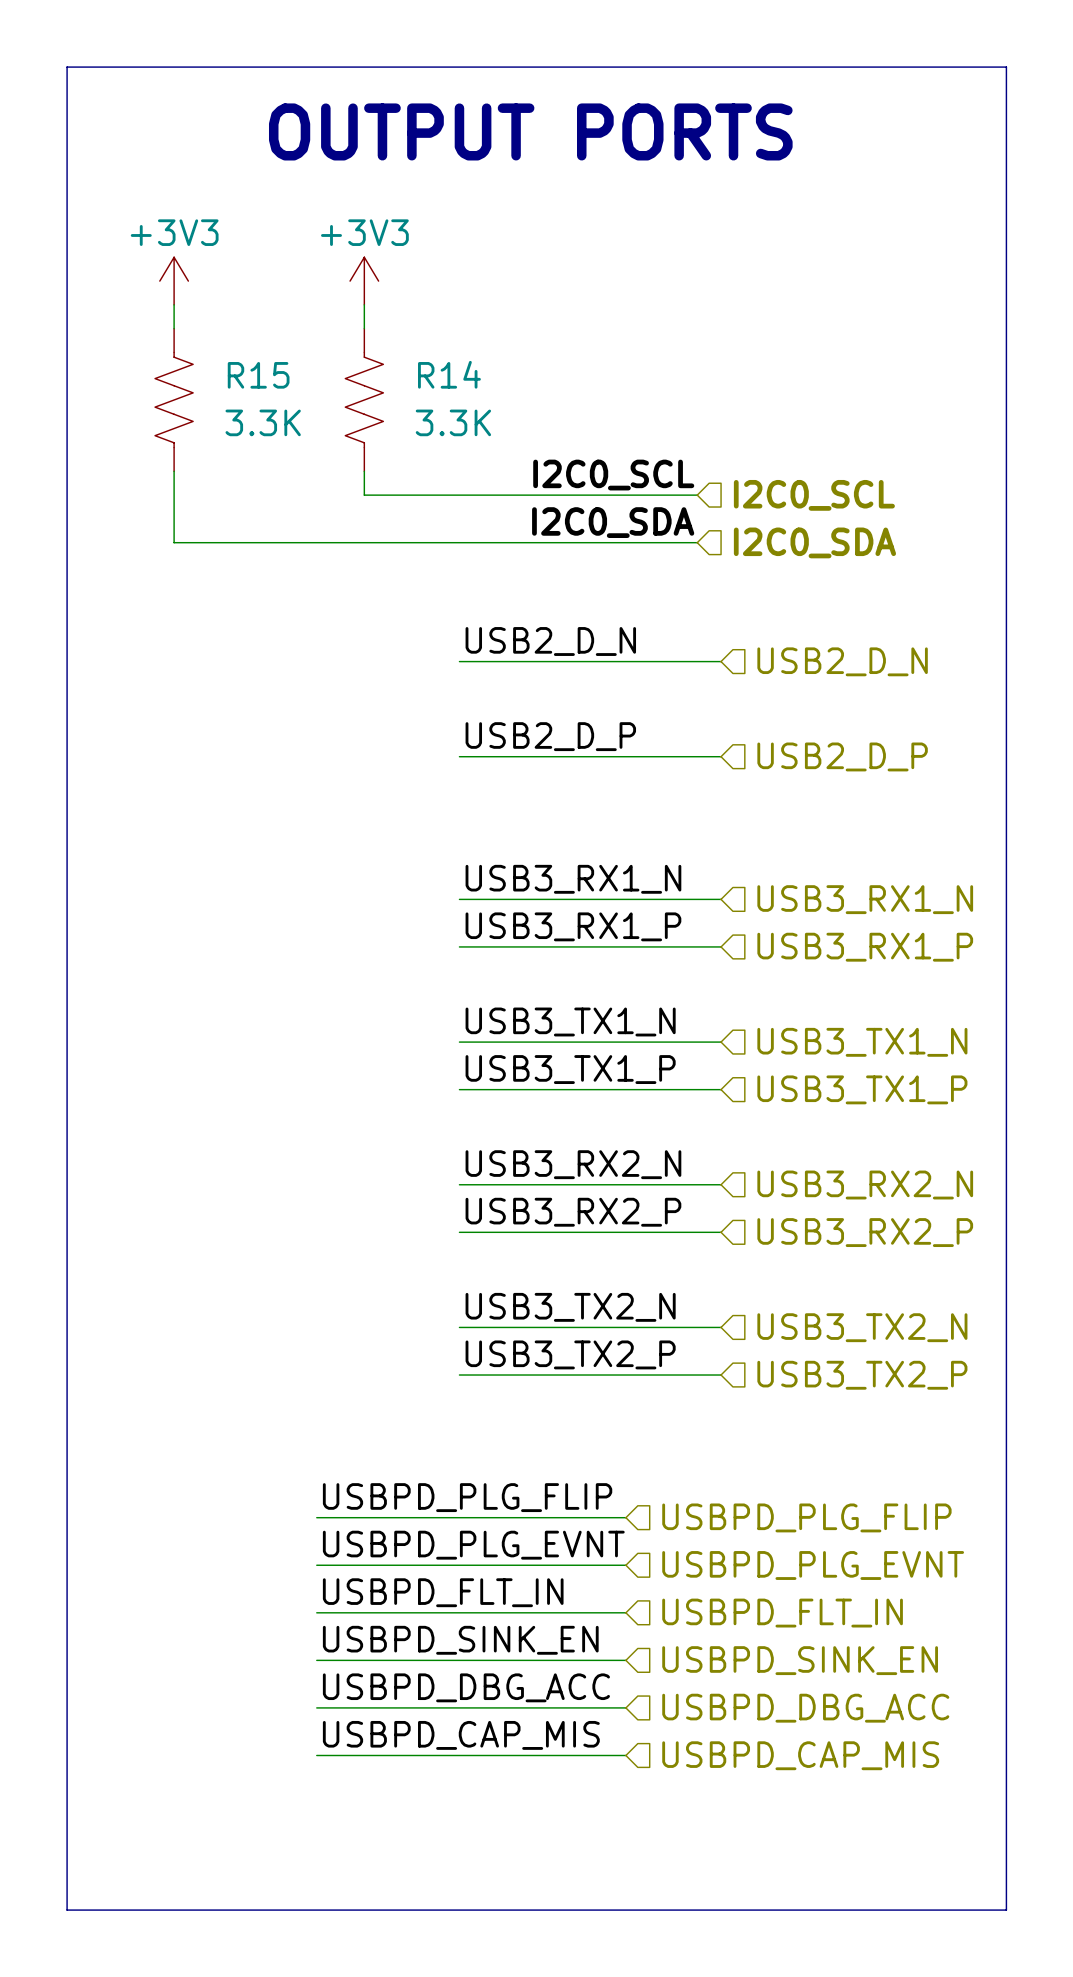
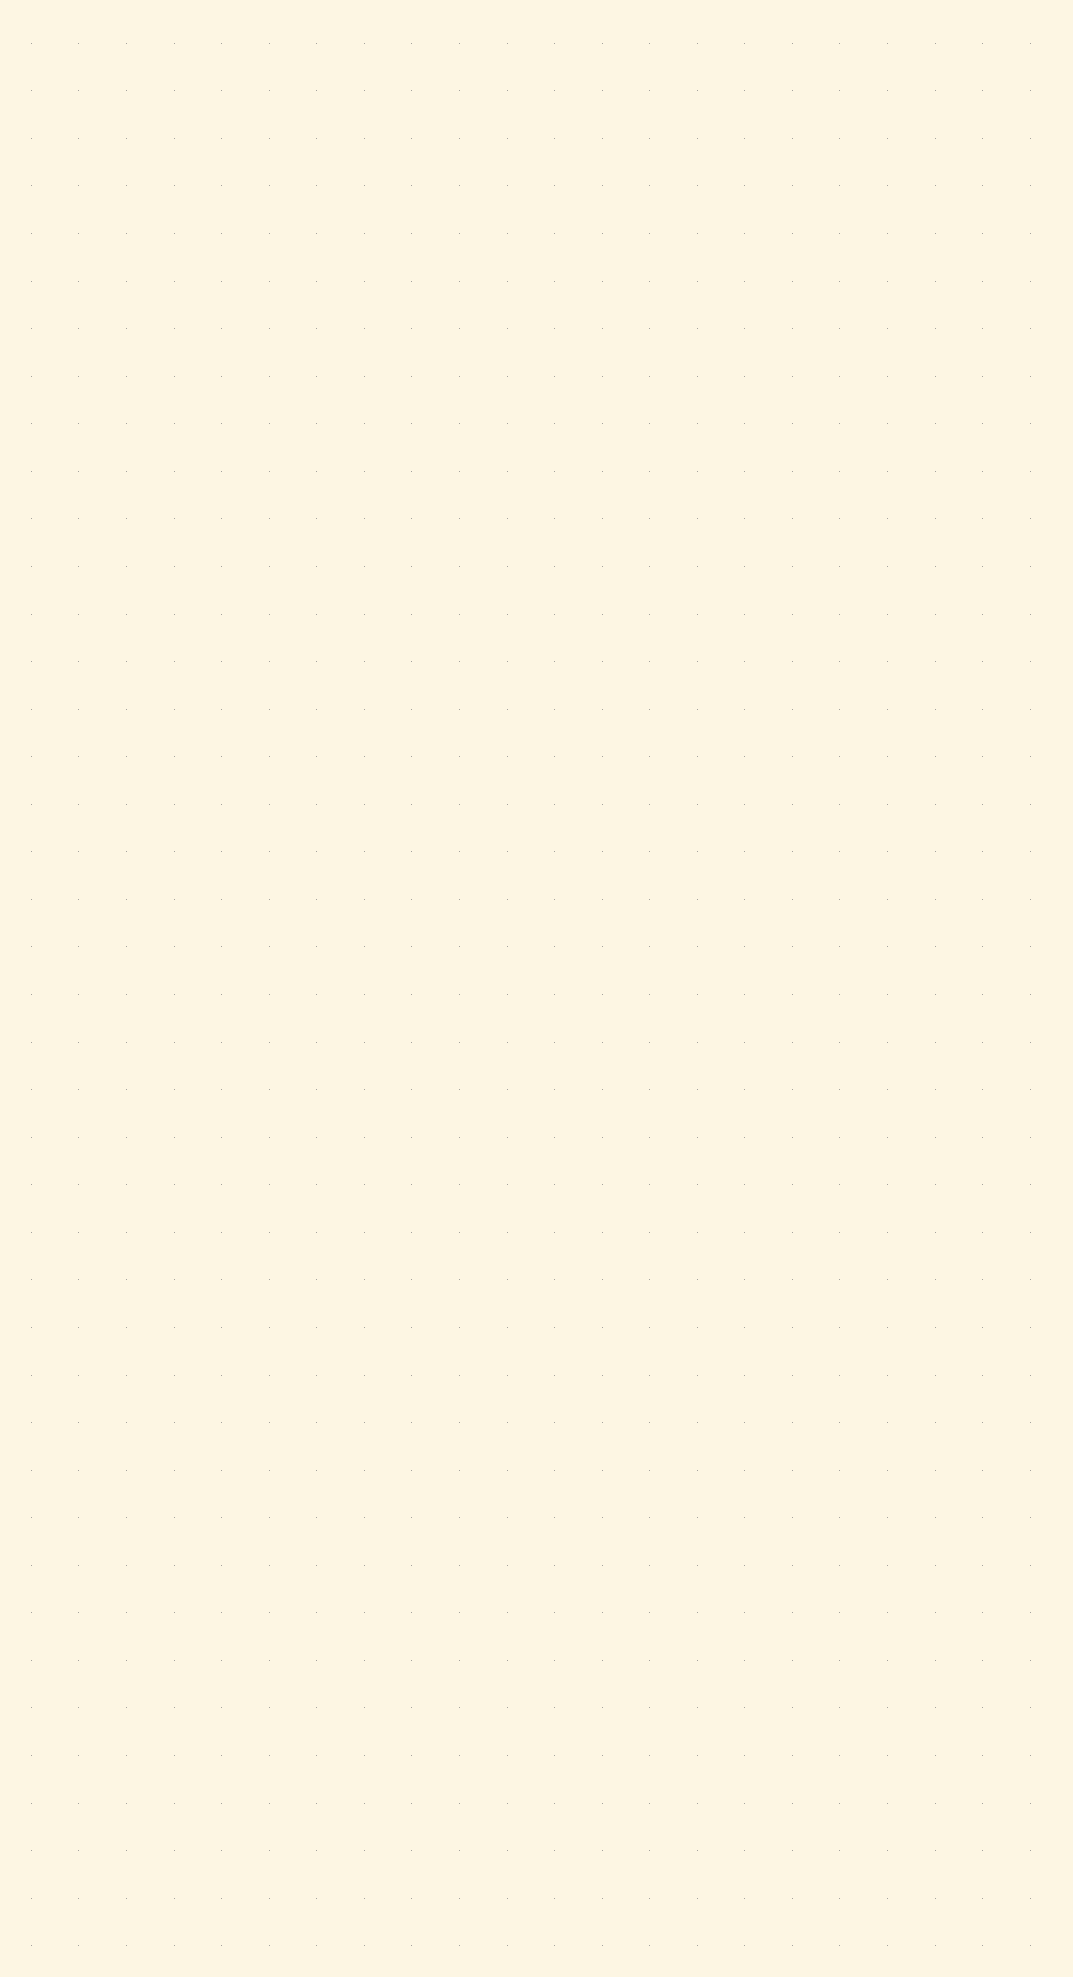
line: (67, 67) (1006, 67) (1006, 1910) (67, 1910) (67, 67) -> none
text: OUTPUT PORTS (530, 131) -> none
power symbol: +3V3 (174, 281) -> none
power symbol: +3V3 (364, 281) -> none
wire: (174, 304) (174, 328) -> none
wire: (364, 304) (364, 328) -> none
R15: 3.3K (174, 400) -> none
R14: 3.3K (364, 400) -> none
wire: (174, 471) (174, 542) (697, 542) -> none
wire: (364, 471) (364, 495) (697, 495) -> none
label: I2C0_SCL (613, 475) -> none
hierarchical label: I2C0_SCL (814, 495) -> none
label: I2C0_SDA (613, 522) -> none
hierarchical label: I2C0_SDA (814, 542) -> none
label: USB2_D_N (550, 641) -> none
wire: (459, 661) (721, 661) -> none
hierarchical label: USB2_D_N (842, 661) -> none
label: USB2_D_P (550, 736) -> none
wire: (459, 756) (721, 756) -> none
hierarchical label: USB2_D_P (842, 756) -> none
label: USB3_RX1_N (573, 879) -> none
wire: (459, 899) (721, 899) -> none
hierarchical label: USB3_RX1_N (865, 899) -> none
label: USB3_RX1_P (573, 926) -> none
wire: (459, 946) (721, 946) -> none
hierarchical label: USB3_RX1_P (865, 947) -> none
label: USB3_TX1_N (570, 1021) -> none
wire: (459, 1042) (721, 1042) -> none
hierarchical label: USB3_TX1_N (862, 1042) -> none
label: USB3_TX1_P (570, 1069) -> none
wire: (459, 1089) (721, 1089) -> none
hierarchical label: USB3_TX1_P (862, 1089) -> none
label: USB3_RX2_N (573, 1164) -> none
wire: (459, 1184) (721, 1184) -> none
hierarchical label: USB3_RX2_N (865, 1185) -> none
label: USB3_RX2_P (573, 1212) -> none
wire: (459, 1232) (721, 1232) -> none
hierarchical label: USB3_RX2_P (865, 1232) -> none
label: USB3_TX2_N (570, 1307) -> none
wire: (459, 1327) (721, 1327) -> none
hierarchical label: USB3_TX2_N (862, 1327) -> none
label: USB3_TX2_P (570, 1354) -> none
wire: (459, 1375) (721, 1375) -> none
hierarchical label: USB3_TX2_P (862, 1375) -> none
label: USBPD_PLG_FLIP (467, 1497) -> none
wire: (316, 1517) (625, 1517) -> none
hierarchical label: USBPD_PLG_FLIP (806, 1517) -> none
label: USBPD_PLG_EVNT (473, 1545) -> none
wire: (316, 1565) (625, 1565) -> none
hierarchical label: USBPD_PLG_EVNT (813, 1565) -> none
label: USBPD_FLT_IN (443, 1592) -> none
wire: (316, 1612) (625, 1612) -> none
hierarchical label: USBPD_FLT_IN (782, 1613) -> none
label: USBPD_SINK_EN (460, 1640) -> none
wire: (316, 1660) (625, 1660) -> none
hierarchical label: USBPD_SINK_EN (800, 1660) -> none
label: USBPD_DBG_ACC (466, 1687) -> none
wire: (316, 1707) (625, 1707) -> none
hierarchical label: USBPD_DBG_ACC (805, 1708) -> none
label: USBPD_CAP_MIS (461, 1735) -> none
wire: (316, 1755) (625, 1755) -> none
hierarchical label: USBPD_CAP_MIS (800, 1755) -> none

